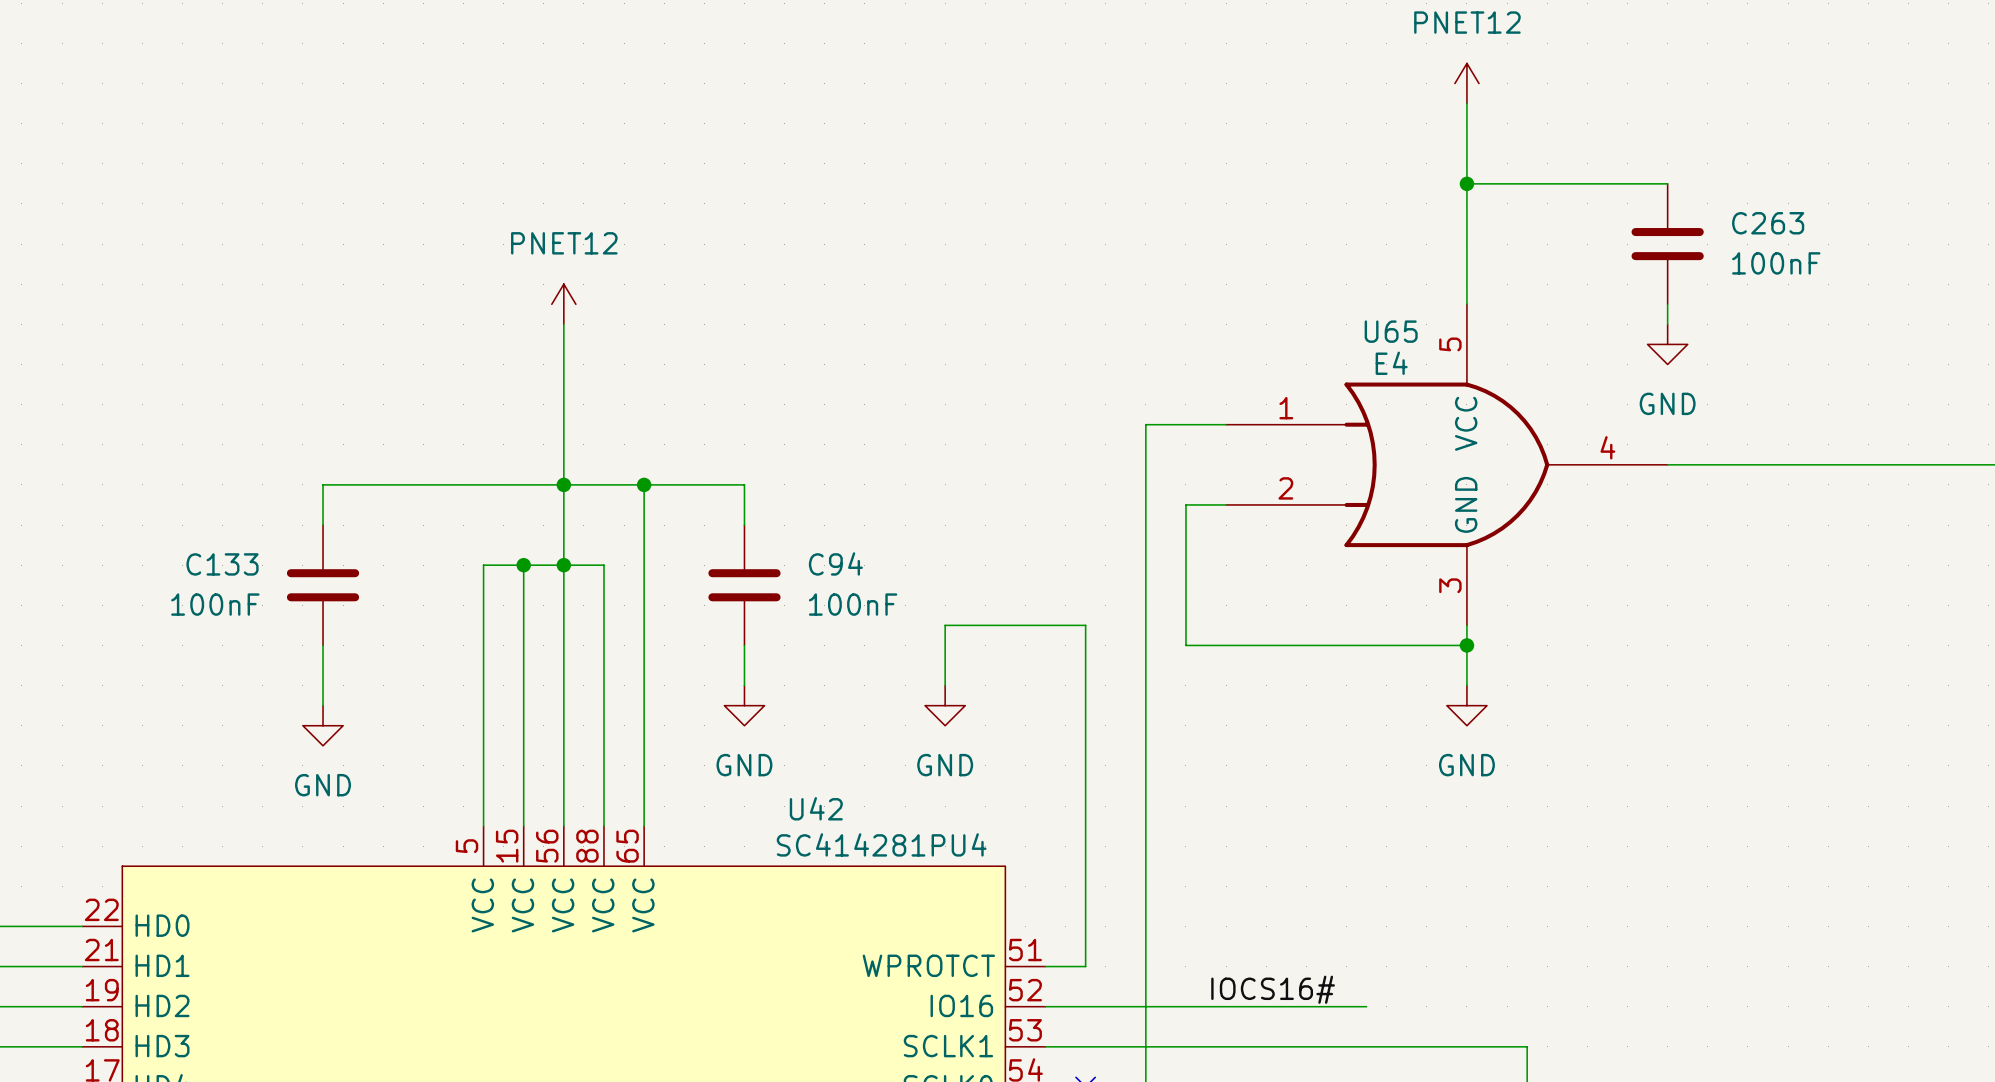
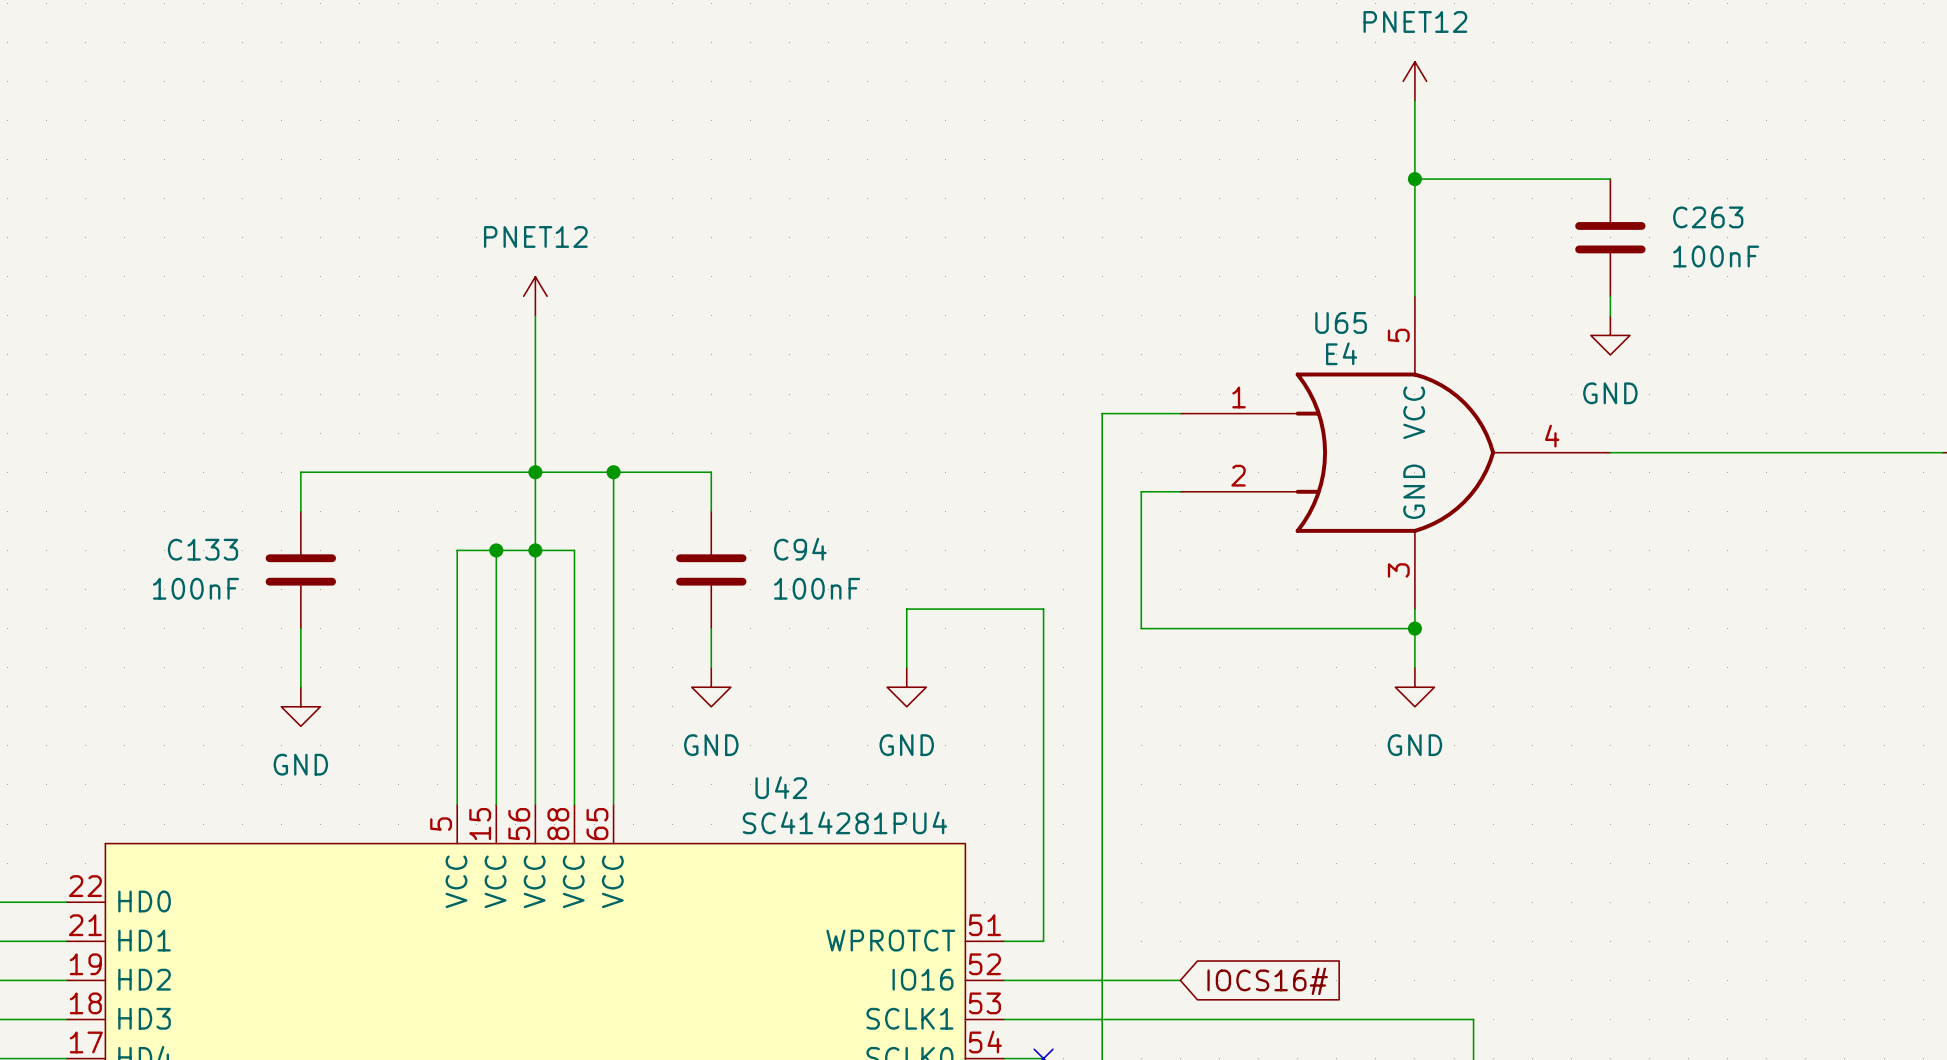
label: IOCS16# (1273, 989) -> none
wire: (1226, 1006) (1366, 1006) -> none
global label: none -> IOCS16# (1267, 981)

